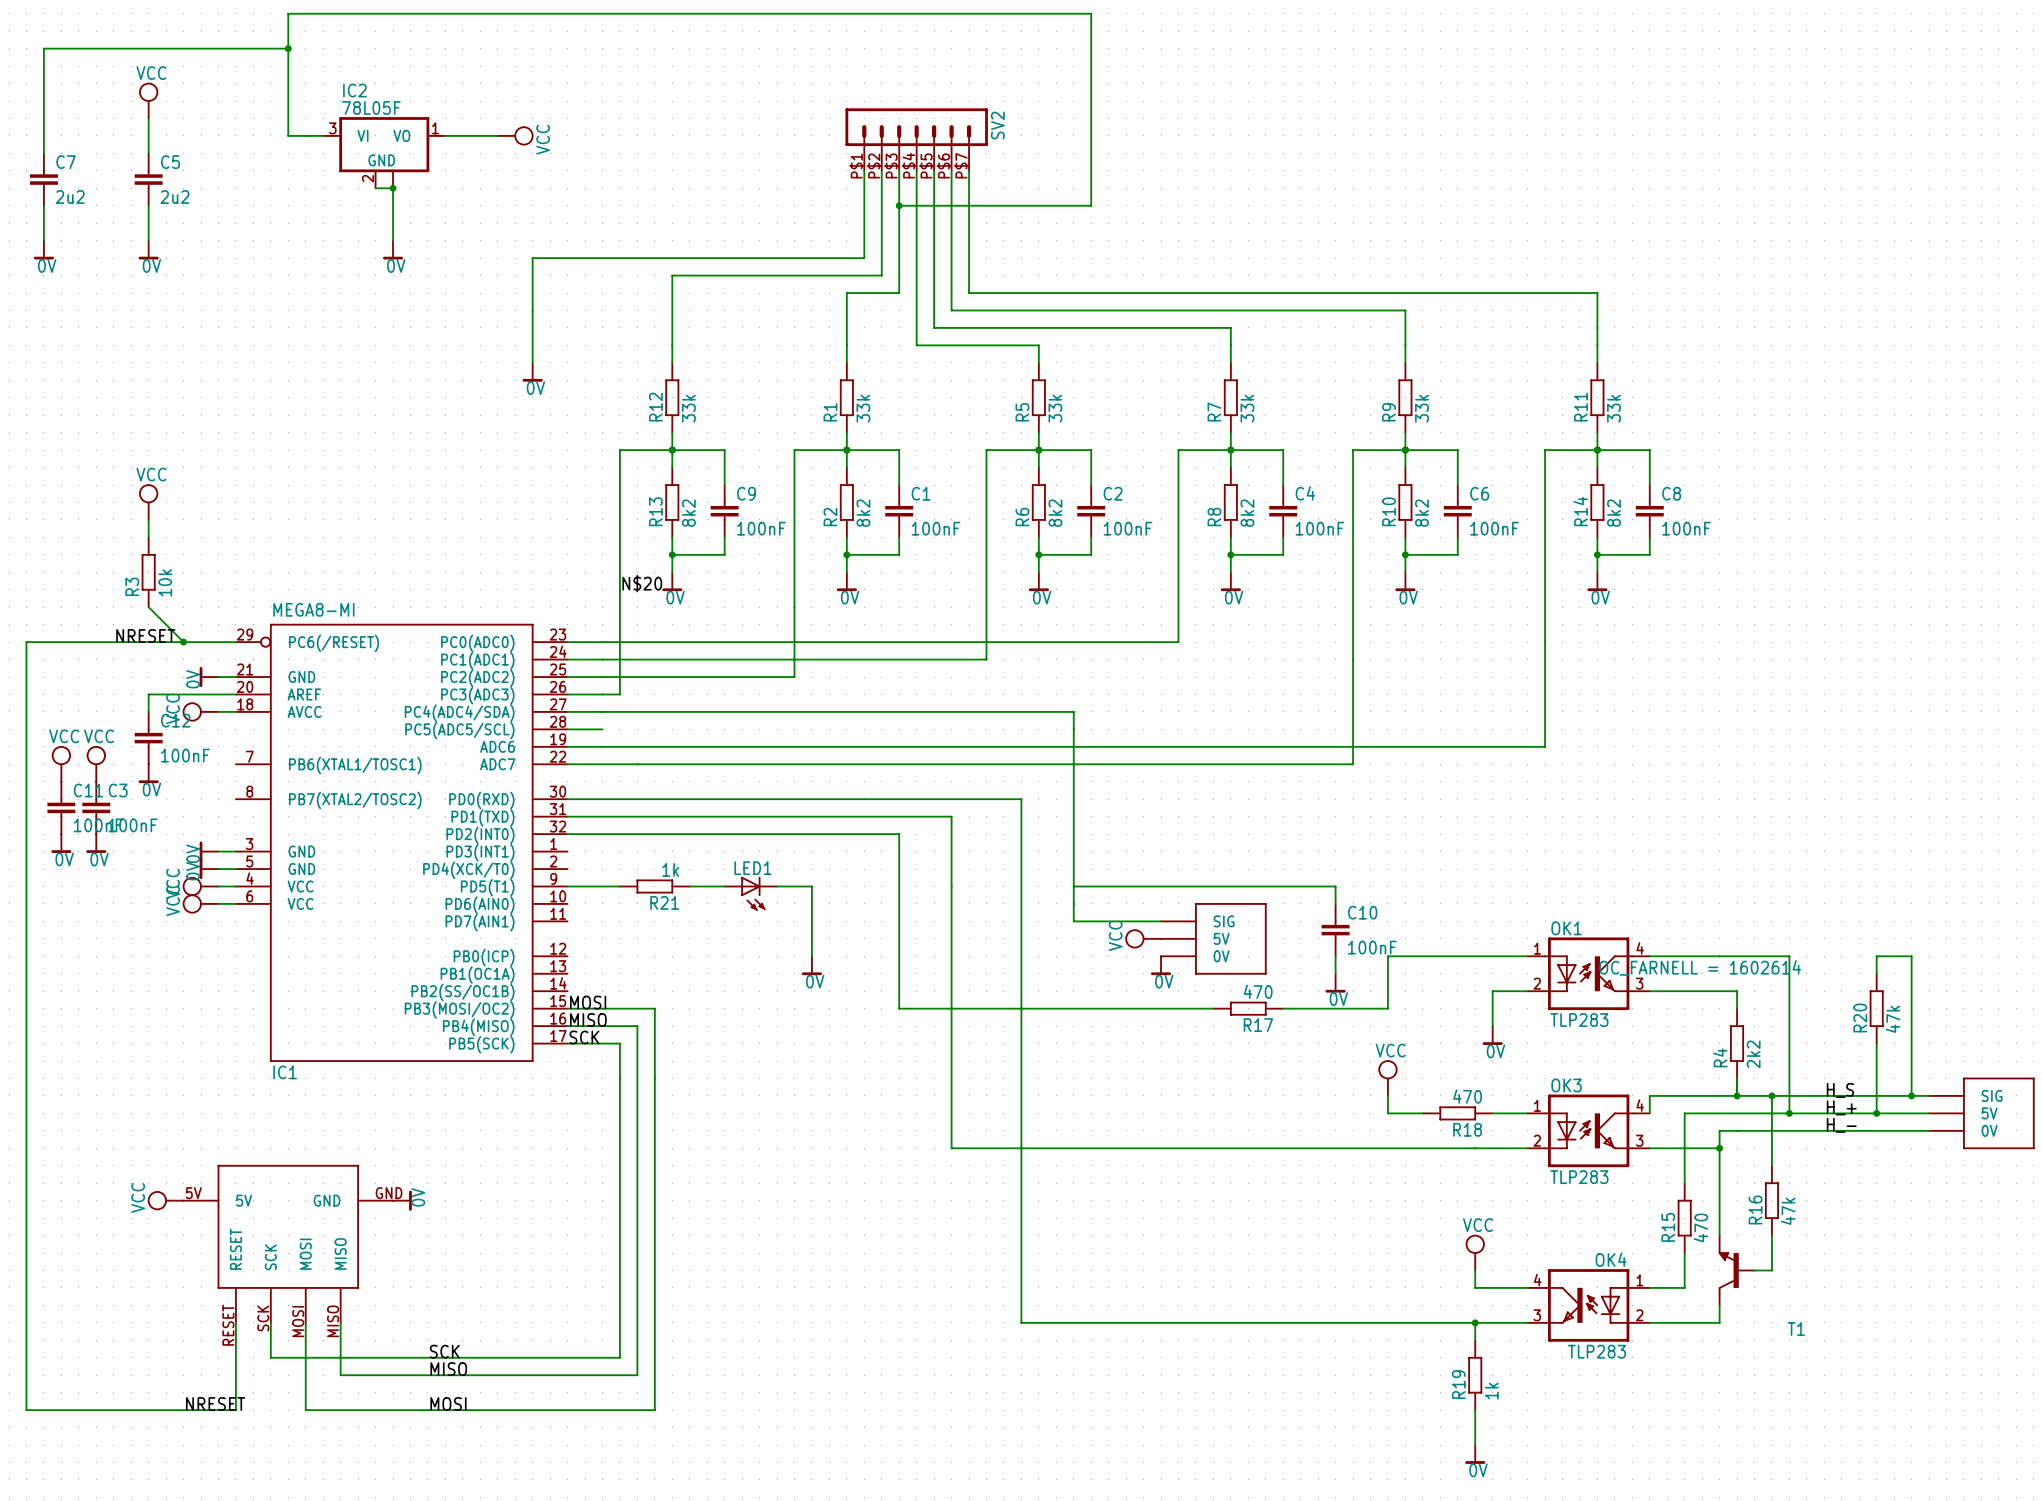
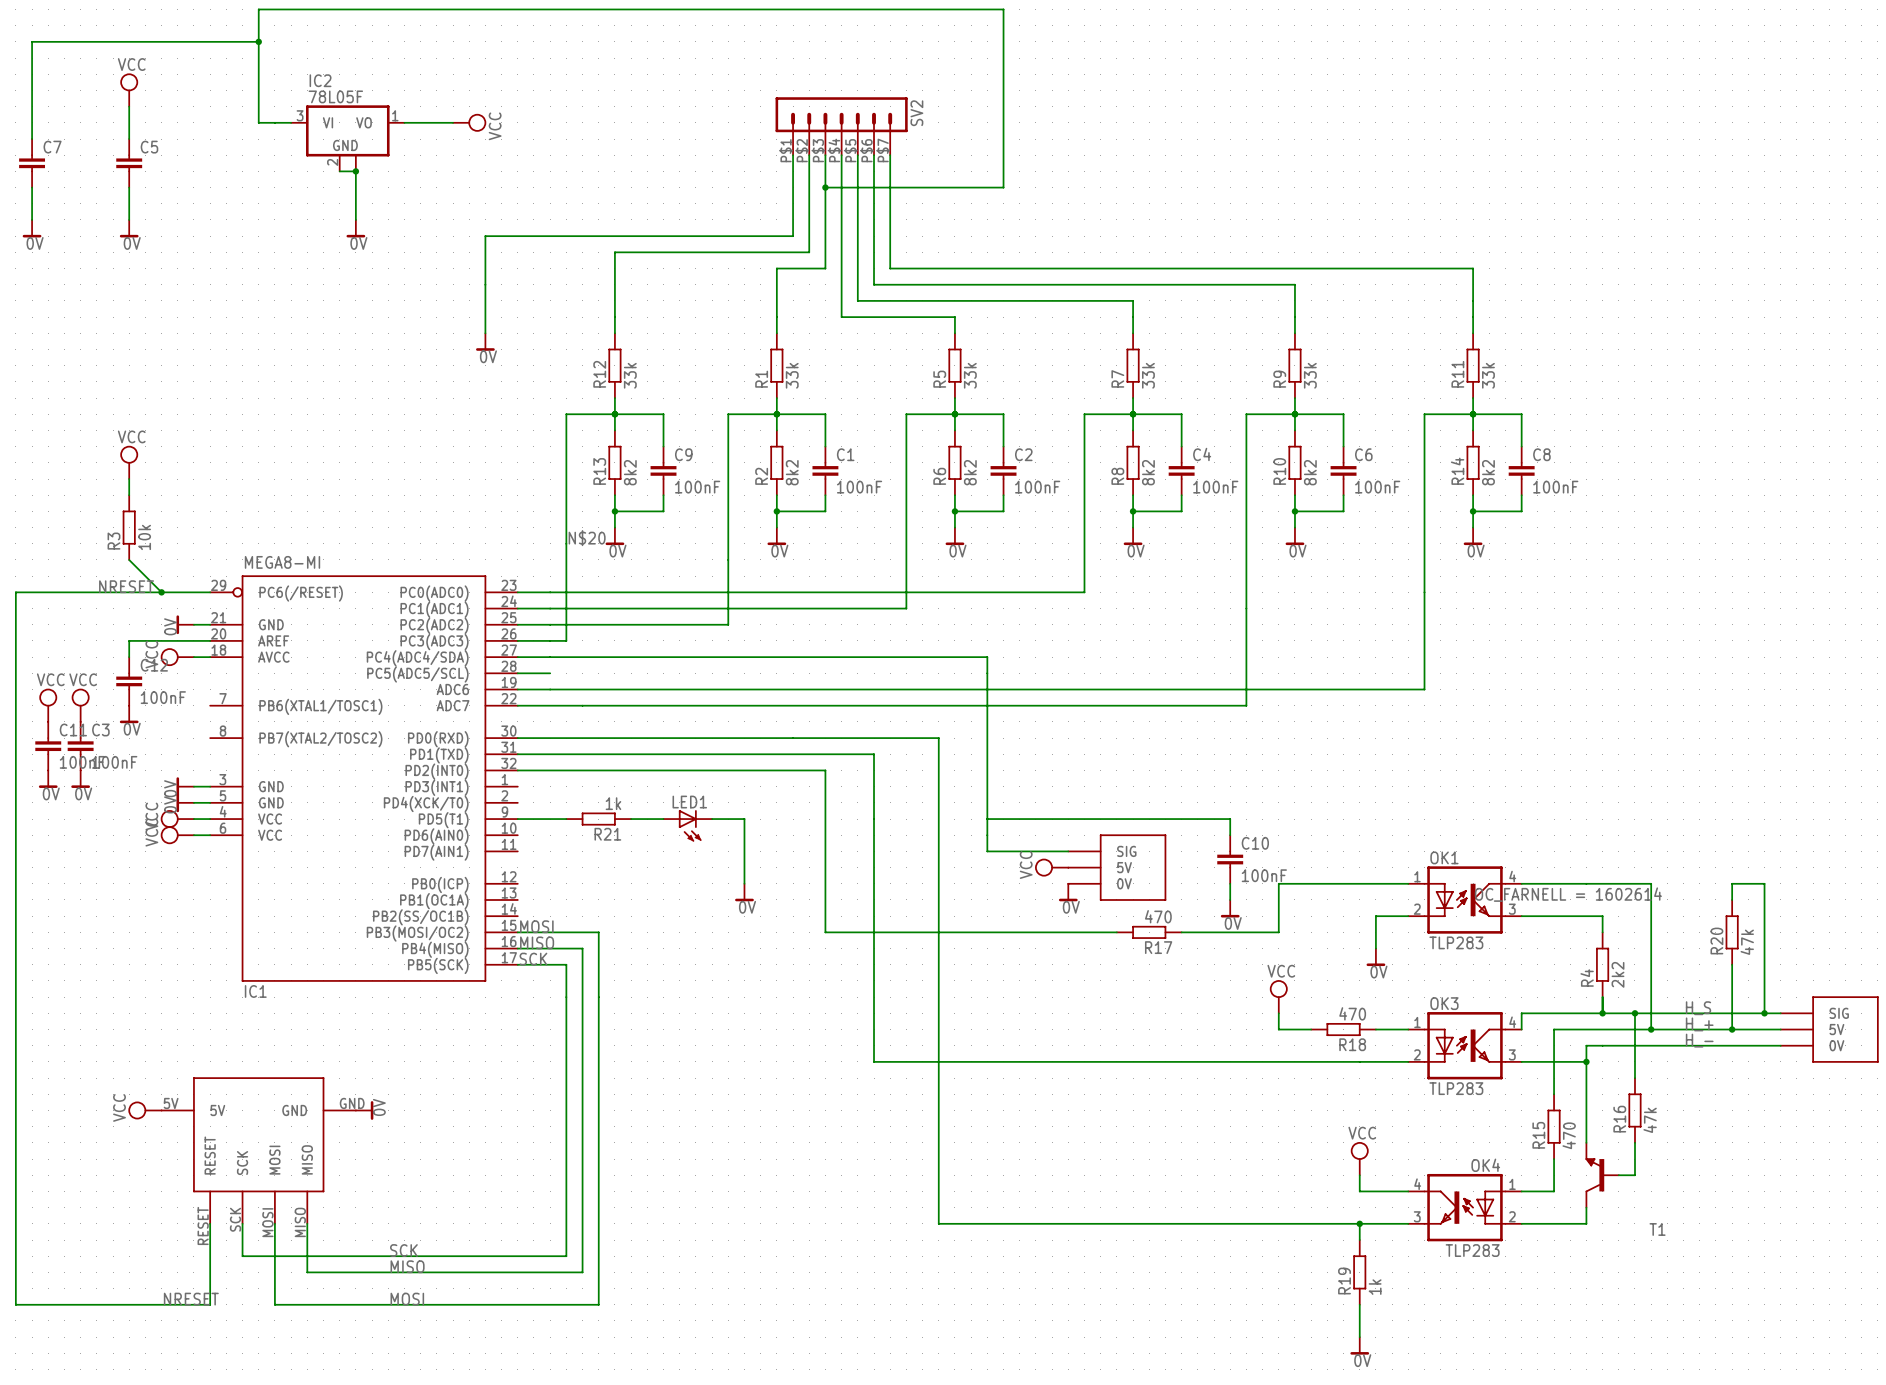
C7 value: 2u2 (70, 197) -> none
C5 value: 2u2 (174, 197) -> none

